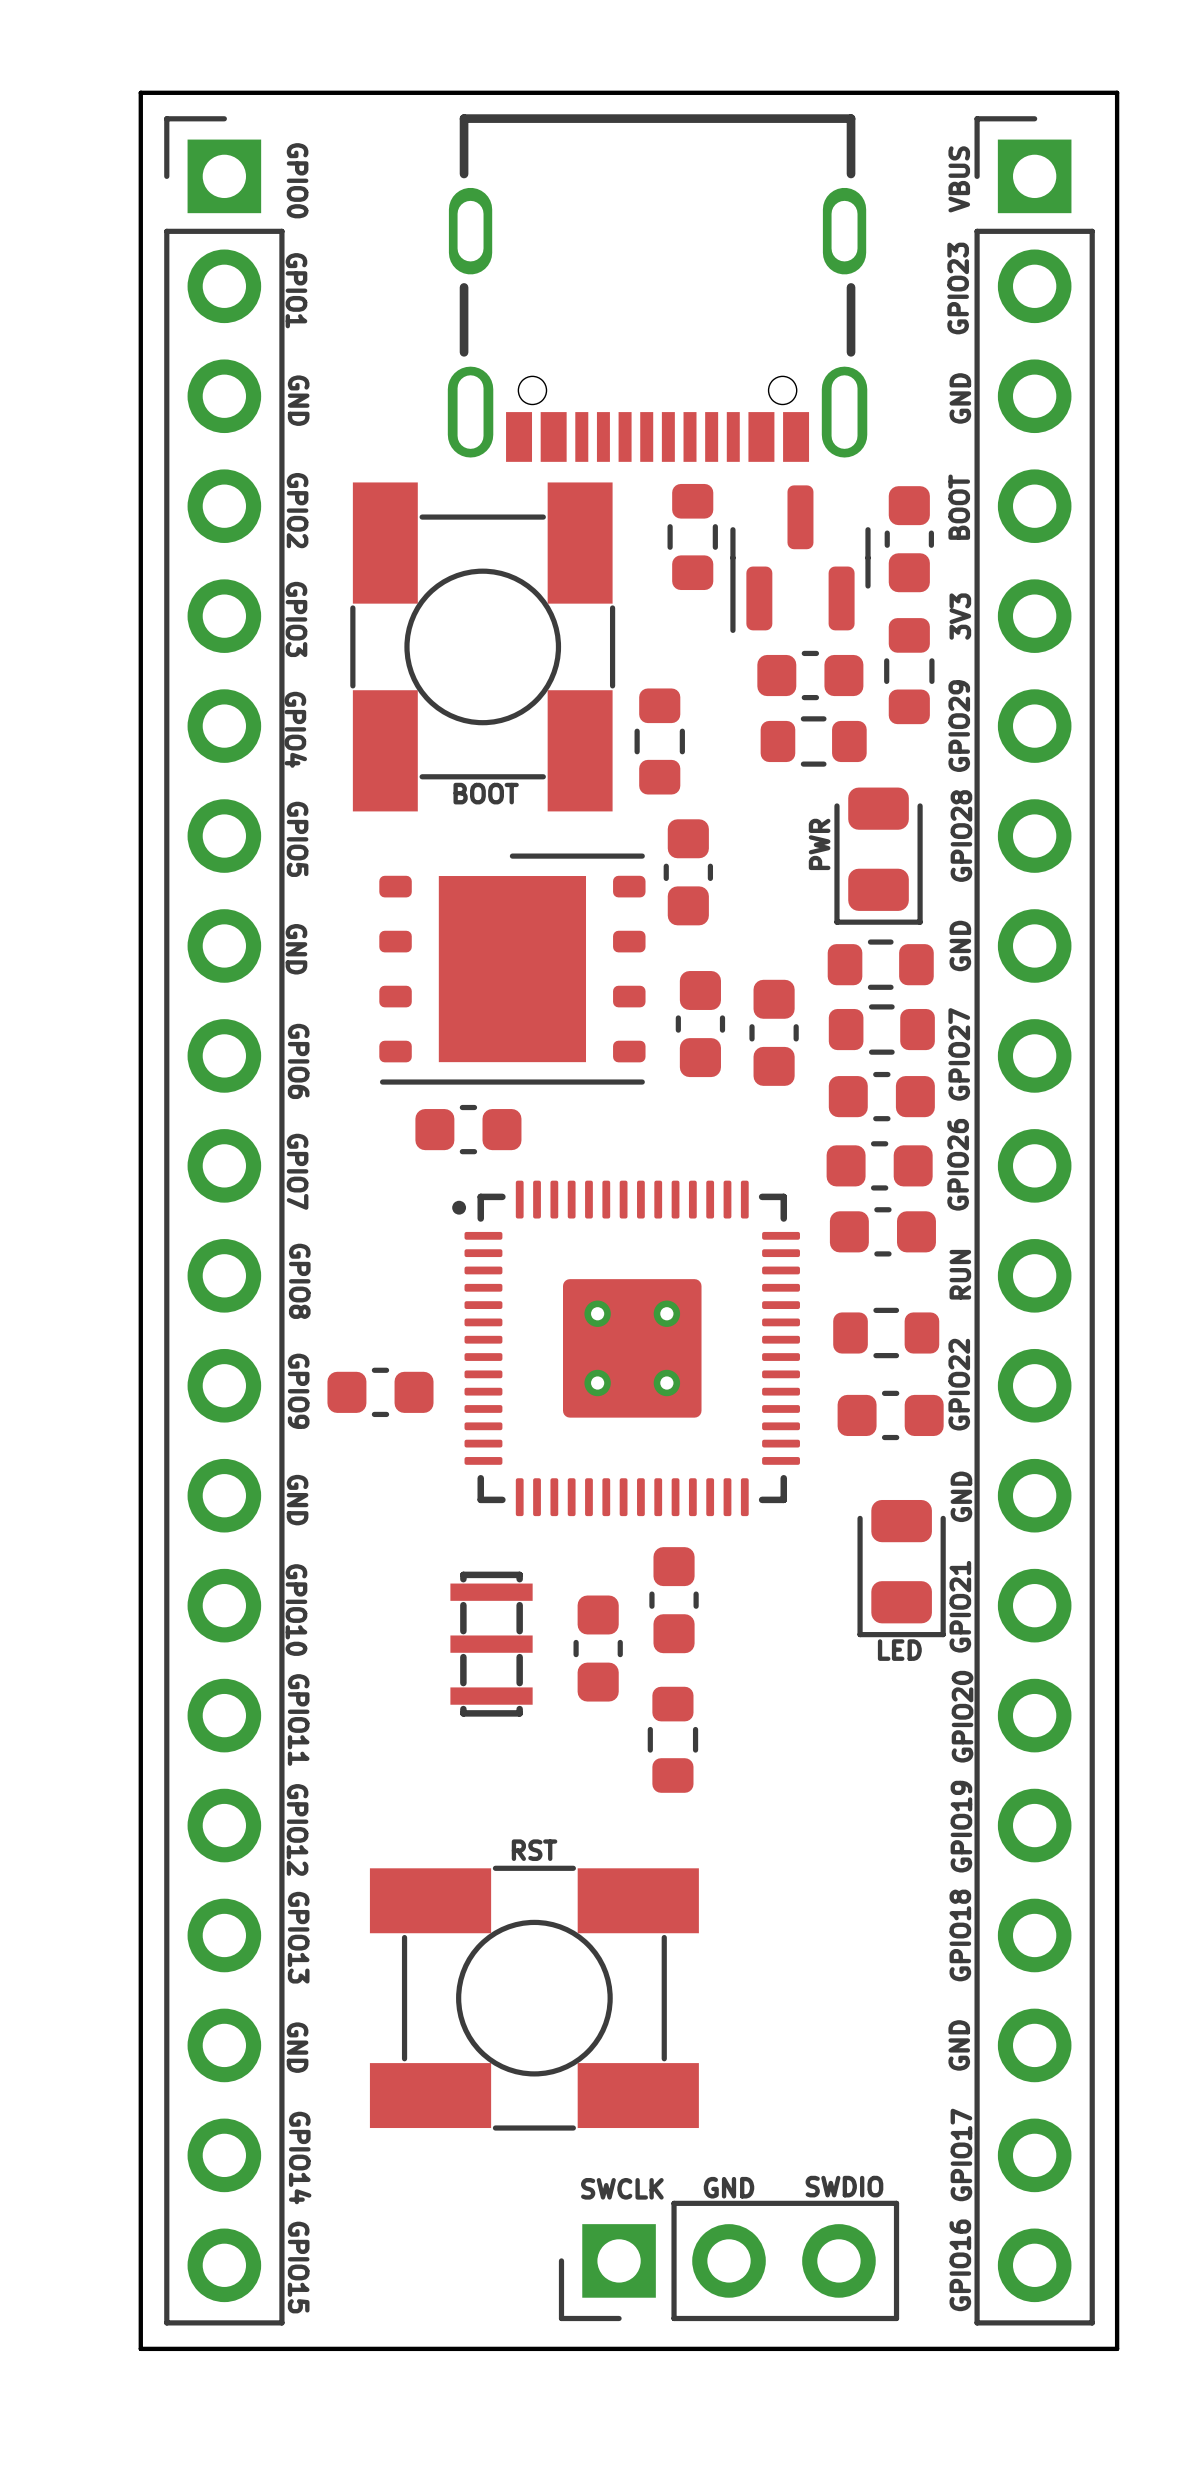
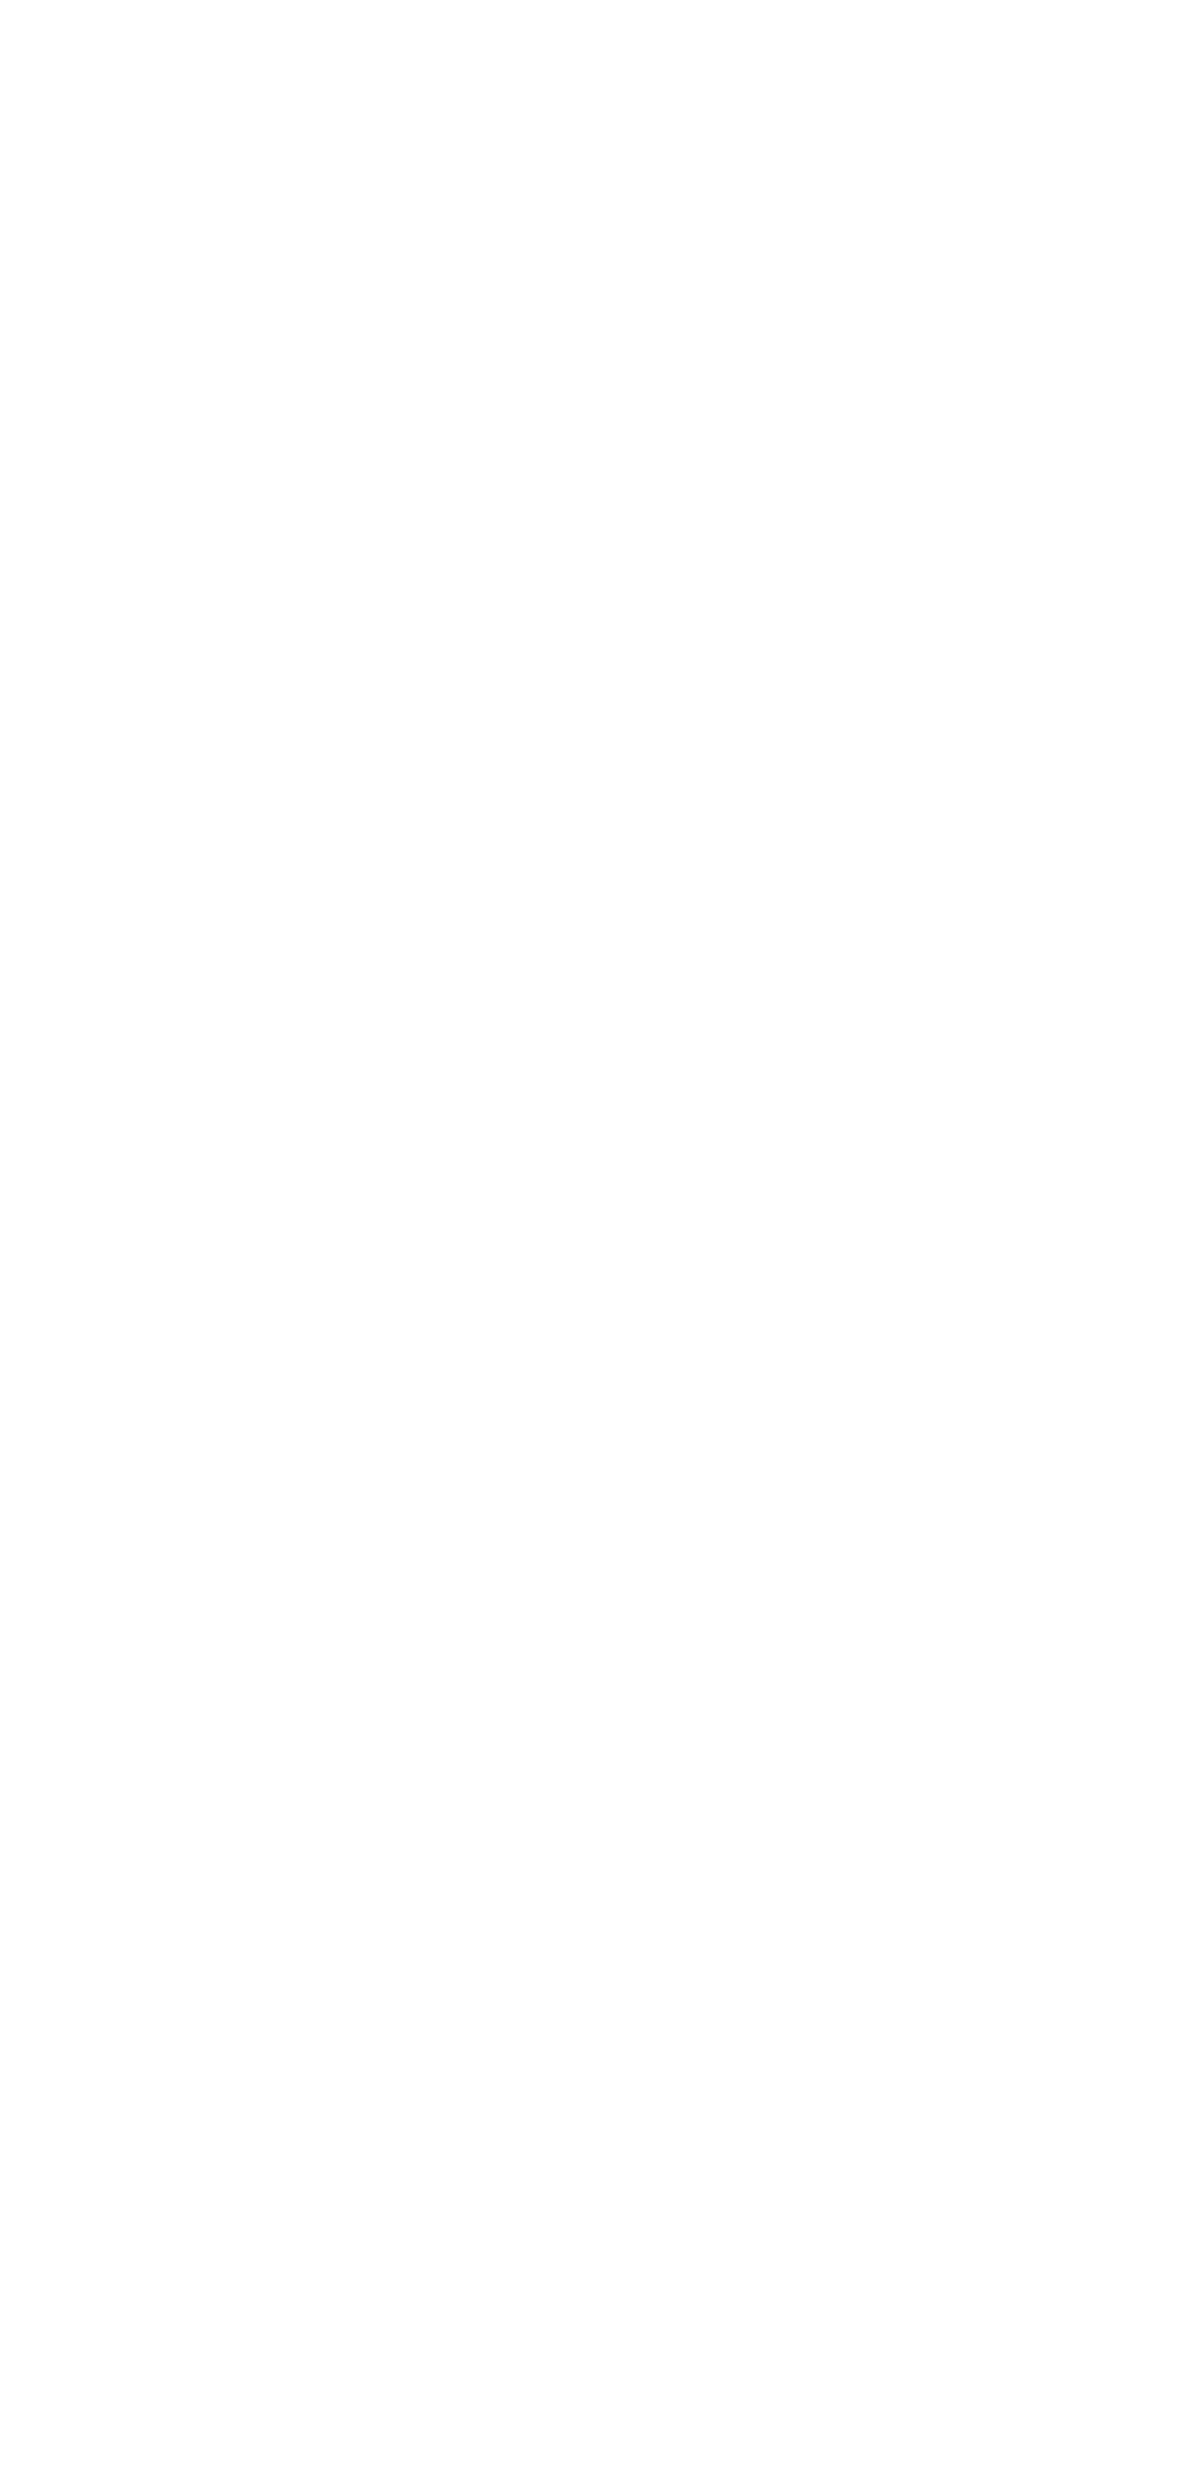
board edge: (140, 92) (1117, 92) (1117, 2348) (140, 2348) (140, 92) -> none
text: VBUS (959, 179) -> none
text: GPIO0 (297, 180) -> none
part: (657, 288) -> none
text: GPIO23 (958, 288) -> none
text: GPIO1 (296, 290) -> none
text: GND (960, 398) -> none
text: GND (298, 400) -> none
text: BOOT (959, 507) -> none
text: GPIO2 (297, 510) -> none
part: (692, 536) -> none
part: (909, 539) -> none
part: (800, 559) -> none
text: 3V3 (960, 616) -> none
text: GPIO3 (296, 619) -> none
BOOT: (482, 646) -> none
part: (909, 671) -> none
part: (810, 675) -> none
text: GPIO29 (959, 726) -> none
text: GPIO4 (295, 729) -> none
part: (659, 741) -> none
part: (813, 741) -> none
text: GPIO28 (961, 836) -> none
text: GPIO5 (297, 839) -> none
PWR: (878, 856) -> none
part: (688, 872) -> none
text: GND (960, 945) -> none
text: GND (296, 949) -> none
part: (880, 964) -> none
part: (512, 969) -> none
part: (700, 1024) -> none
part: (881, 1029) -> none
part: (774, 1032) -> none
text: GPIO27 (959, 1054) -> none
text: GPIO6 (298, 1061) -> none
part: (881, 1096) -> none
part: (468, 1129) -> none
text: GPIO26 (958, 1164) -> none
part: (879, 1165) -> none
text: GPIO7 (297, 1171) -> none
part: (224, 1220) -> none
part: (1034, 1220) -> none
part: (882, 1231) -> none
text: RUN (960, 1274) -> none
text: GPIO8 (299, 1281) -> none
part: (886, 1332) -> none
part: (626, 1348) -> none
text: GPIO22 (959, 1384) -> none
text: GPIO9 (298, 1391) -> none
part: (380, 1392) -> none
part: (890, 1415) -> none
text: GND (961, 1496) -> none
text: GND (297, 1500) -> none
LED: (901, 1568) -> none
part: (674, 1600) -> none
text: GPIO21 (960, 1606) -> none
text: GPIO10 (296, 1610) -> none
part: (491, 1644) -> none
part: (598, 1648) -> none
text: GPIO20 (962, 1716) -> none
text: GPIO11 (298, 1719) -> none
part: (672, 1739) -> none
text: GPIO19 (961, 1826) -> none
text: GPIO12 (297, 1829) -> none
text: GPIO18 (960, 1935) -> none
text: GPIO13 (298, 1937) -> none
RST: (534, 1998) -> none
text: GND (959, 2045) -> none
text: GND (297, 2047) -> none
text: GPIO17 (961, 2154) -> none
text: GPIO14 (300, 2157) -> none
text: SWDIO (844, 2186) -> none
text: GND (729, 2187) -> none
text: SWCLK (622, 2188) -> none
part: (729, 2260) -> none
text: GPIO16 (960, 2265) -> none
text: GPIO15 (298, 2267) -> none

